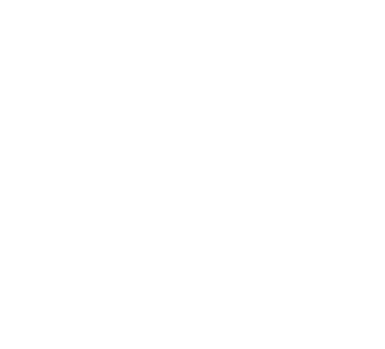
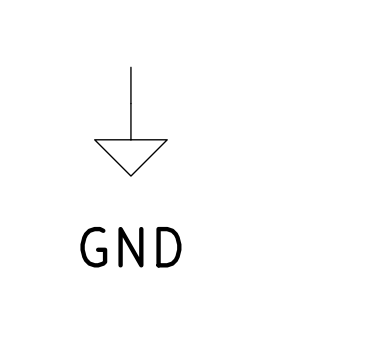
wire: none -> (130, 67) (130, 103)
power symbol: none -> GND (130, 139)

